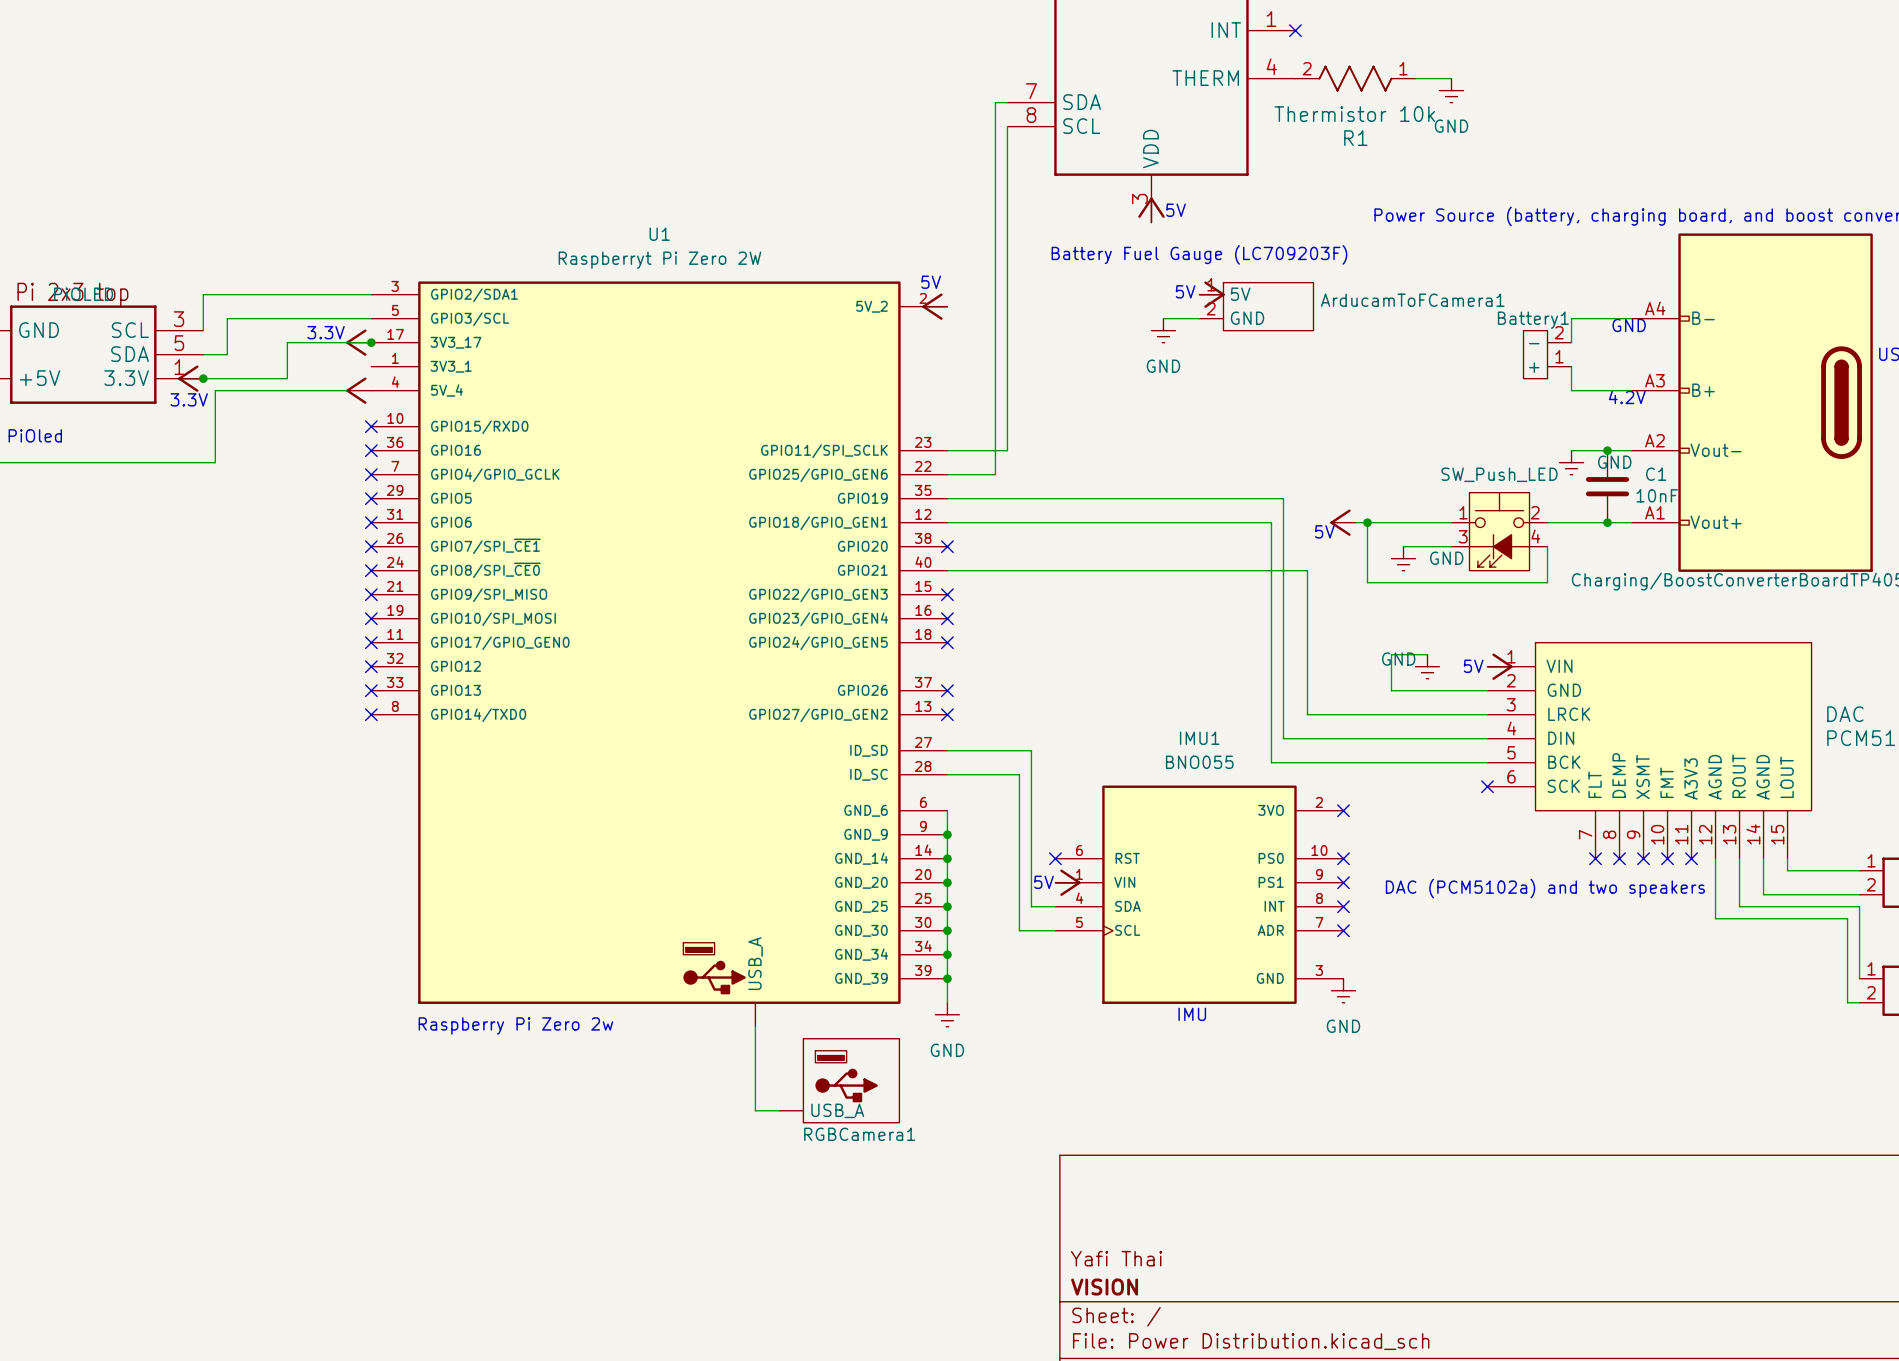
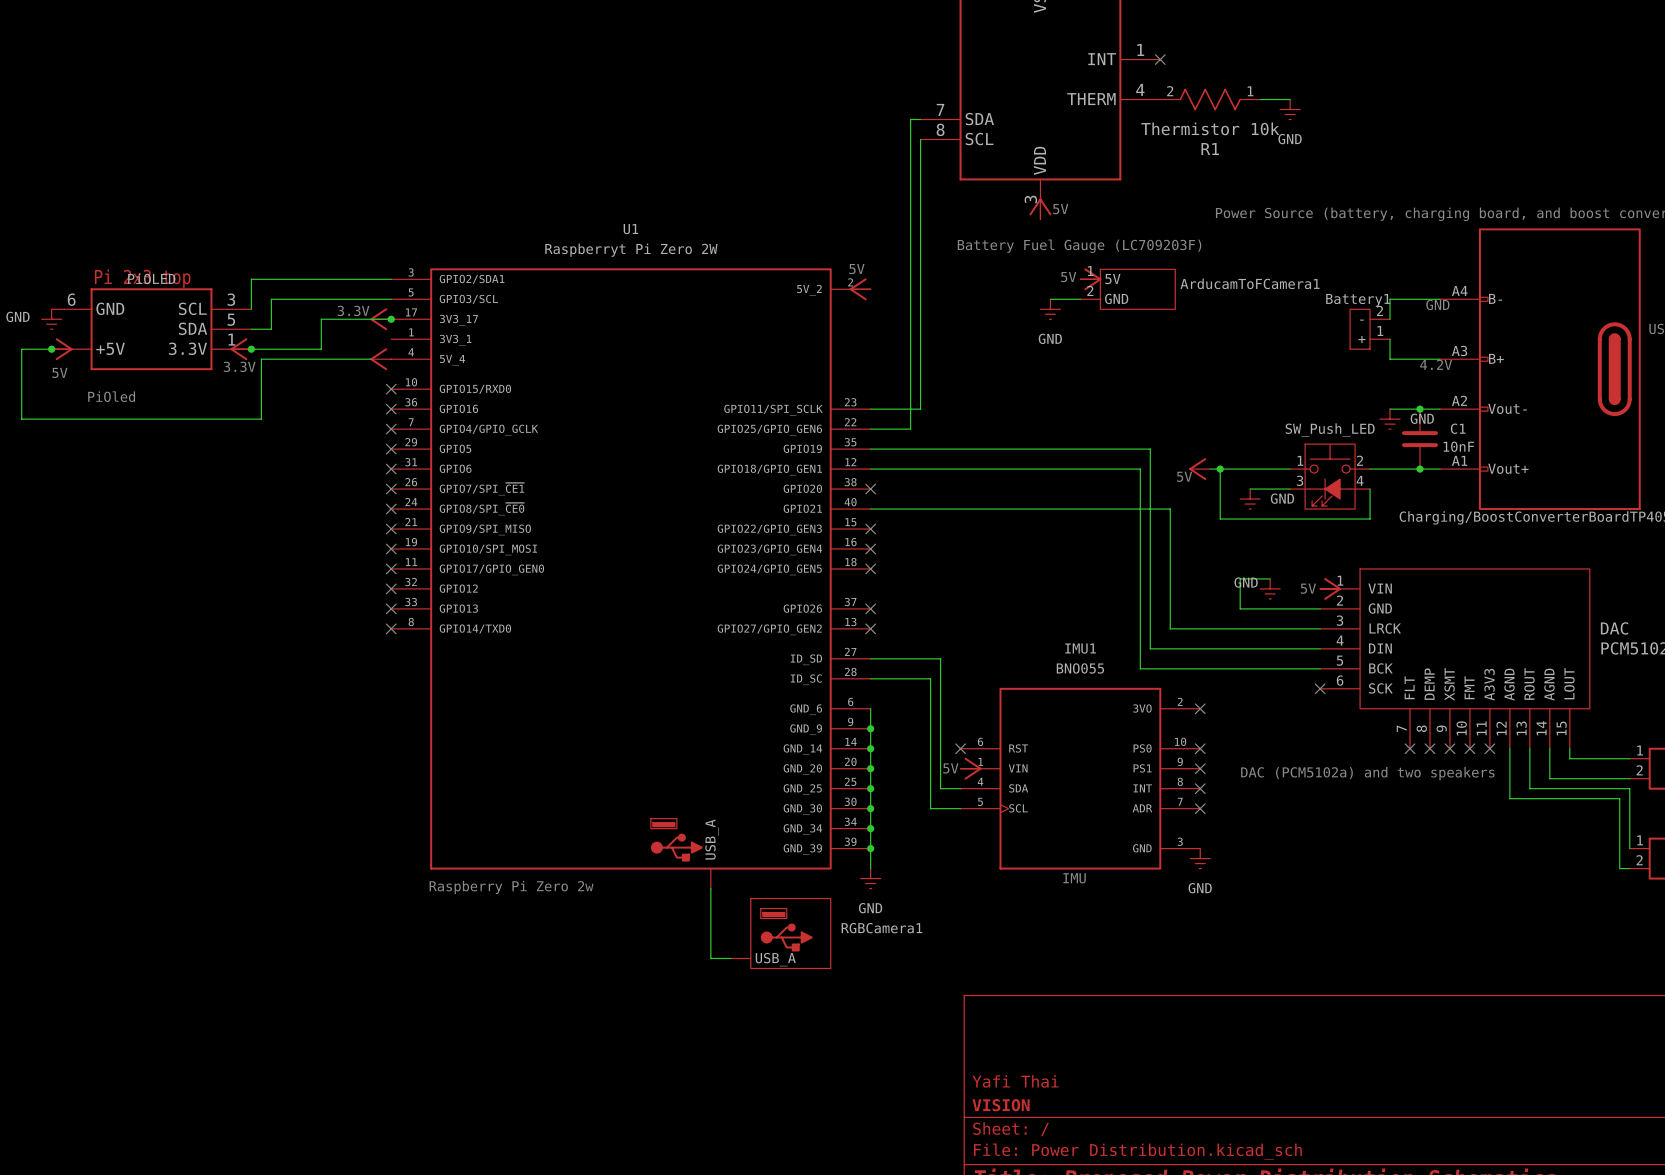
RGBCamera1 name position: RGBCamera1 (859, 1134) -> RGBCamera1 (881, 928)

